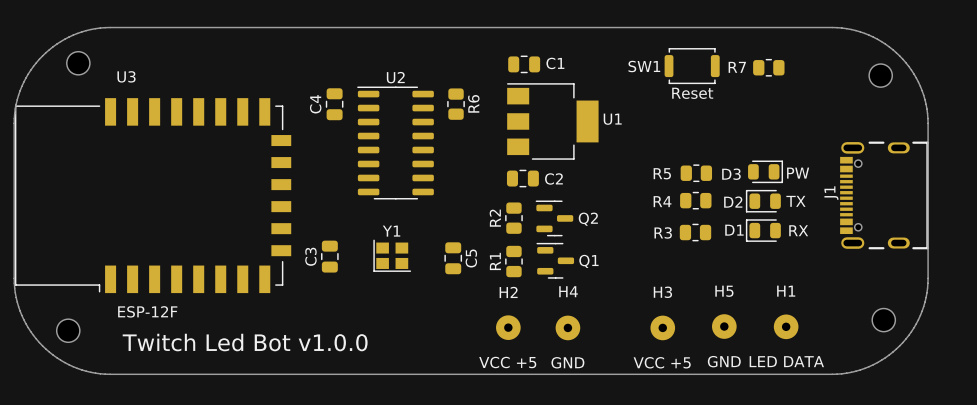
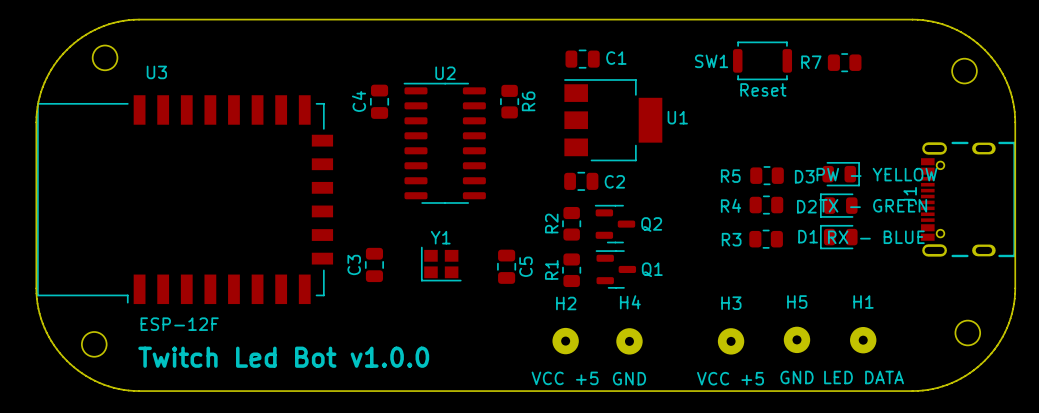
D3 value: PW (798, 173) -> PW - YELLOW (876, 174)
D2 value: TX (795, 201) -> TX - GREEN (873, 205)
D1 value: RX (798, 230) -> RX - BLUE (876, 237)

